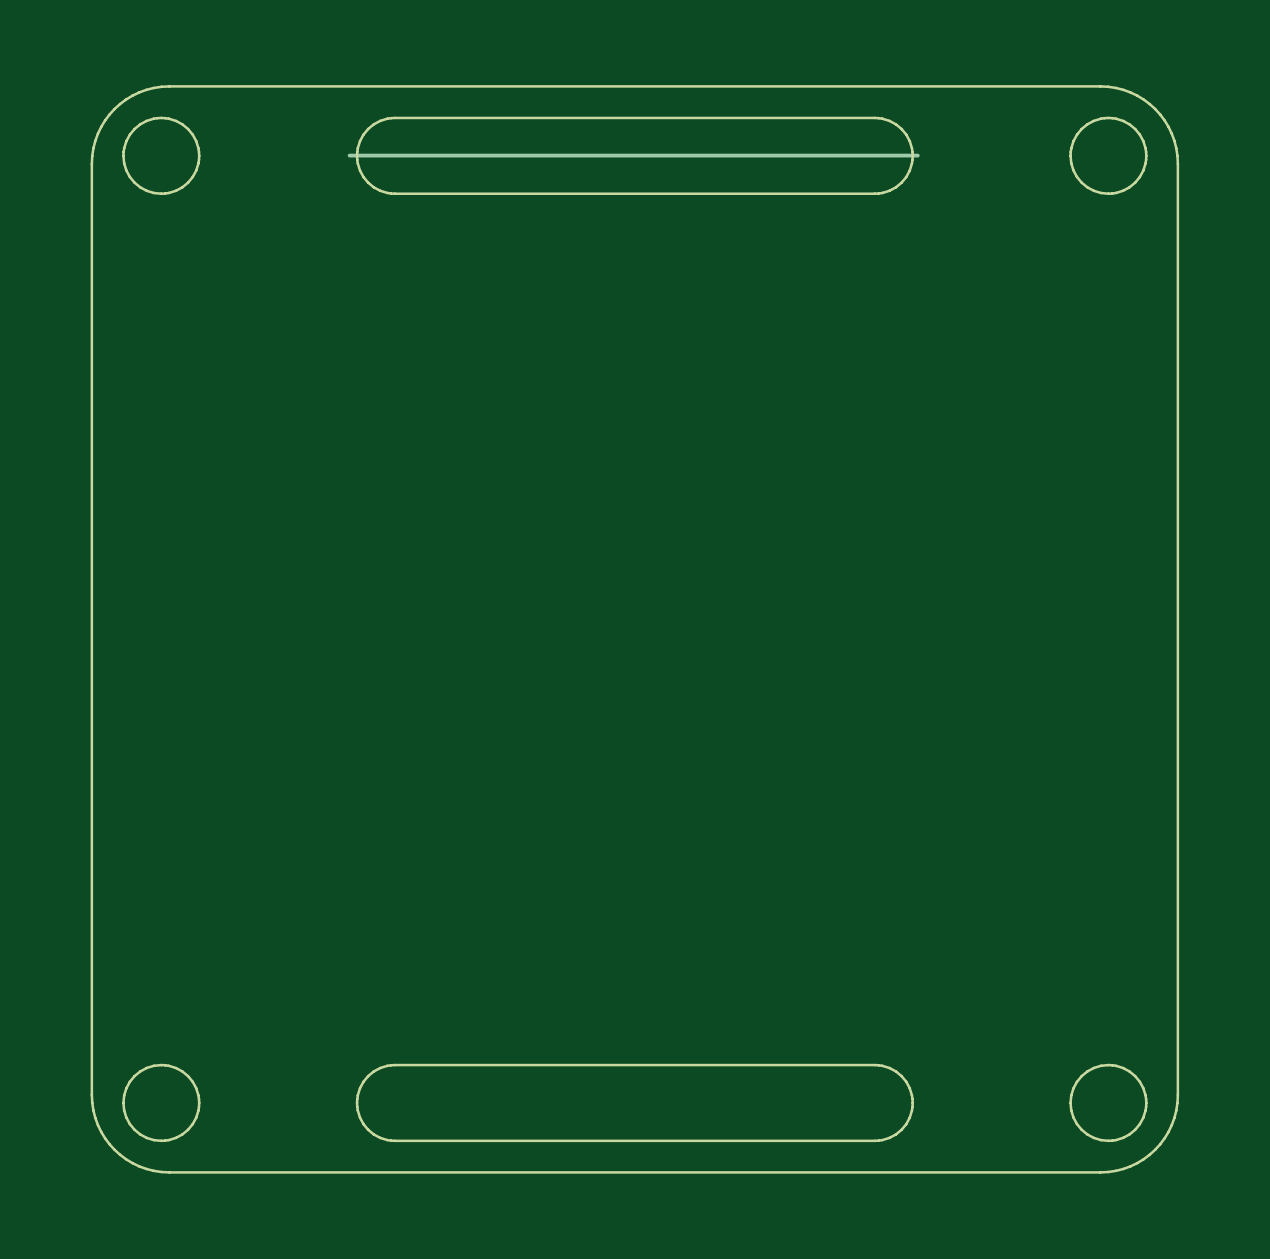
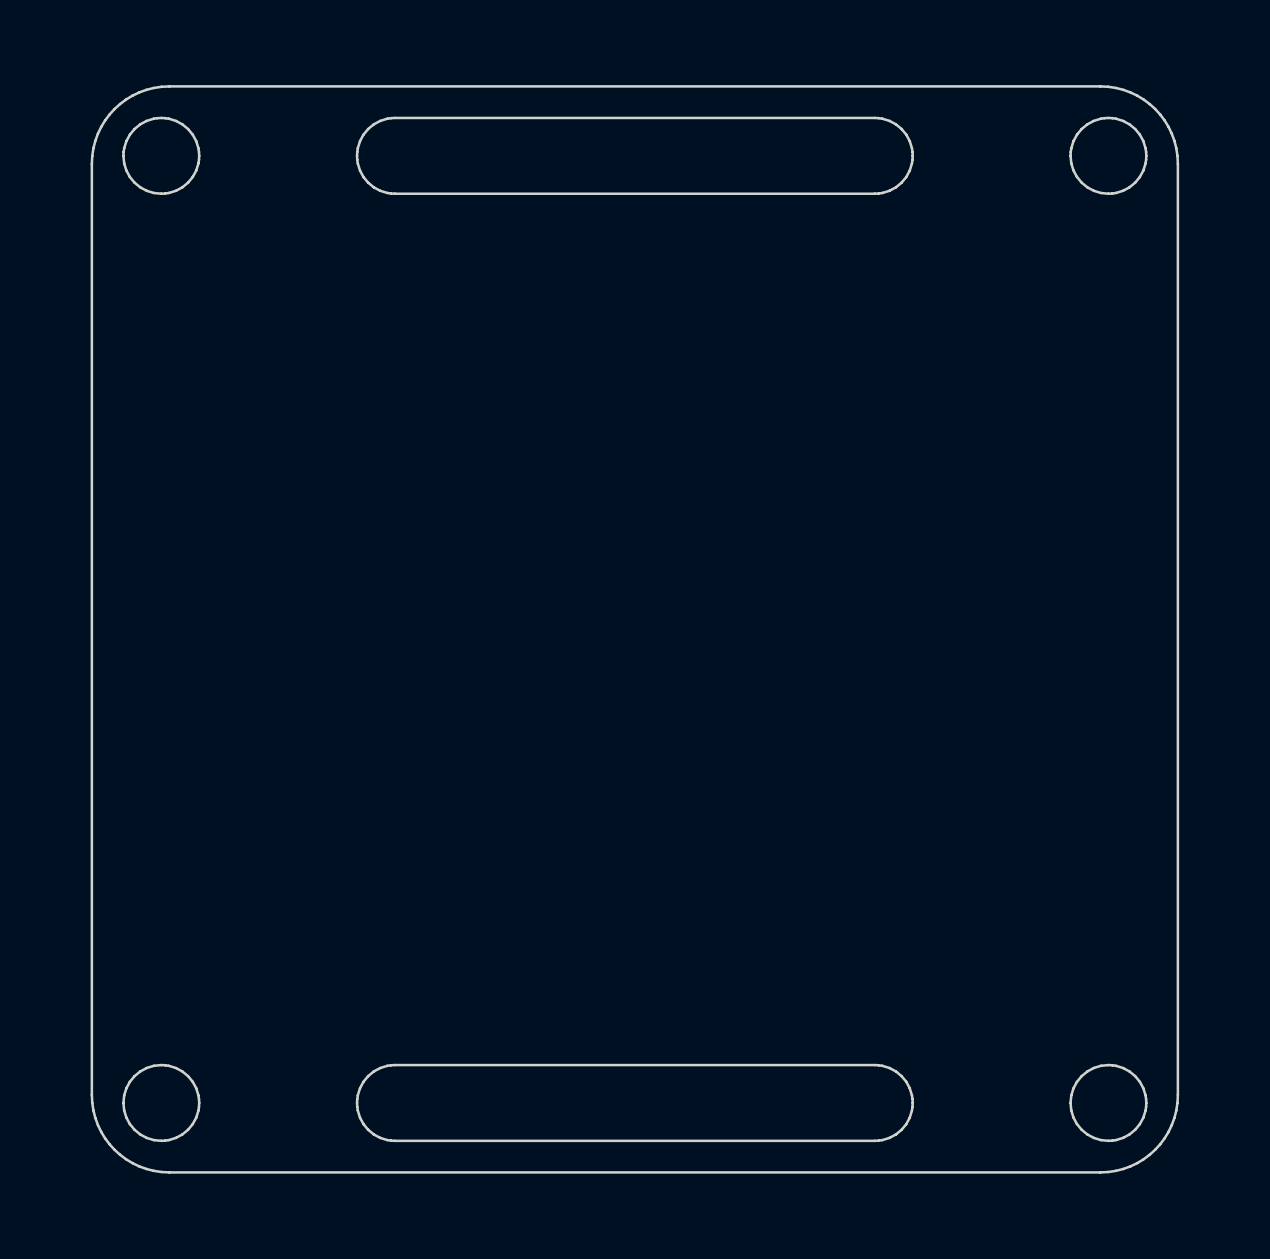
line: (349, 155) (917, 155) -> none

